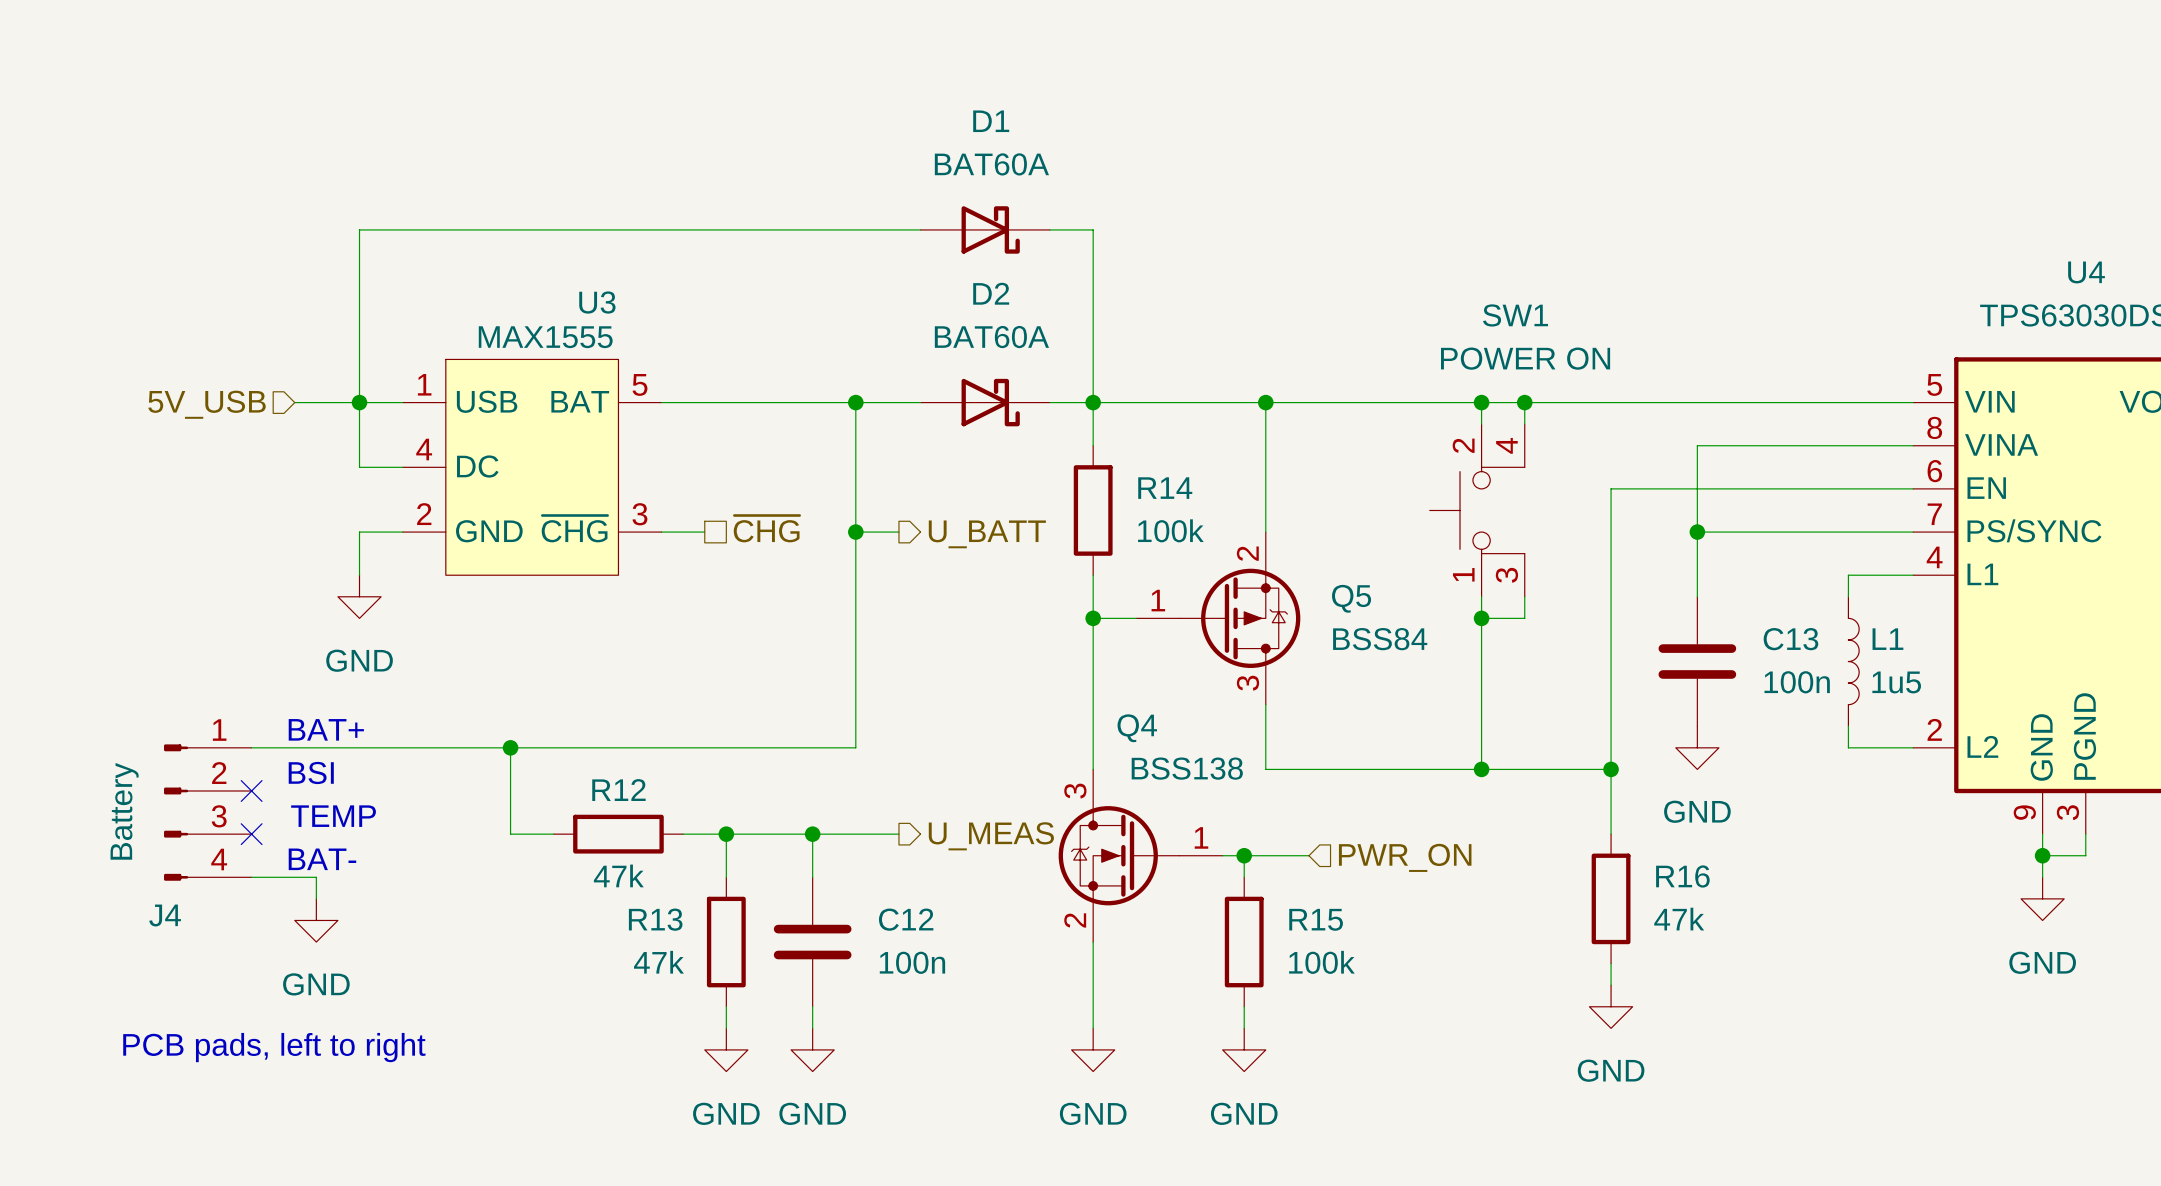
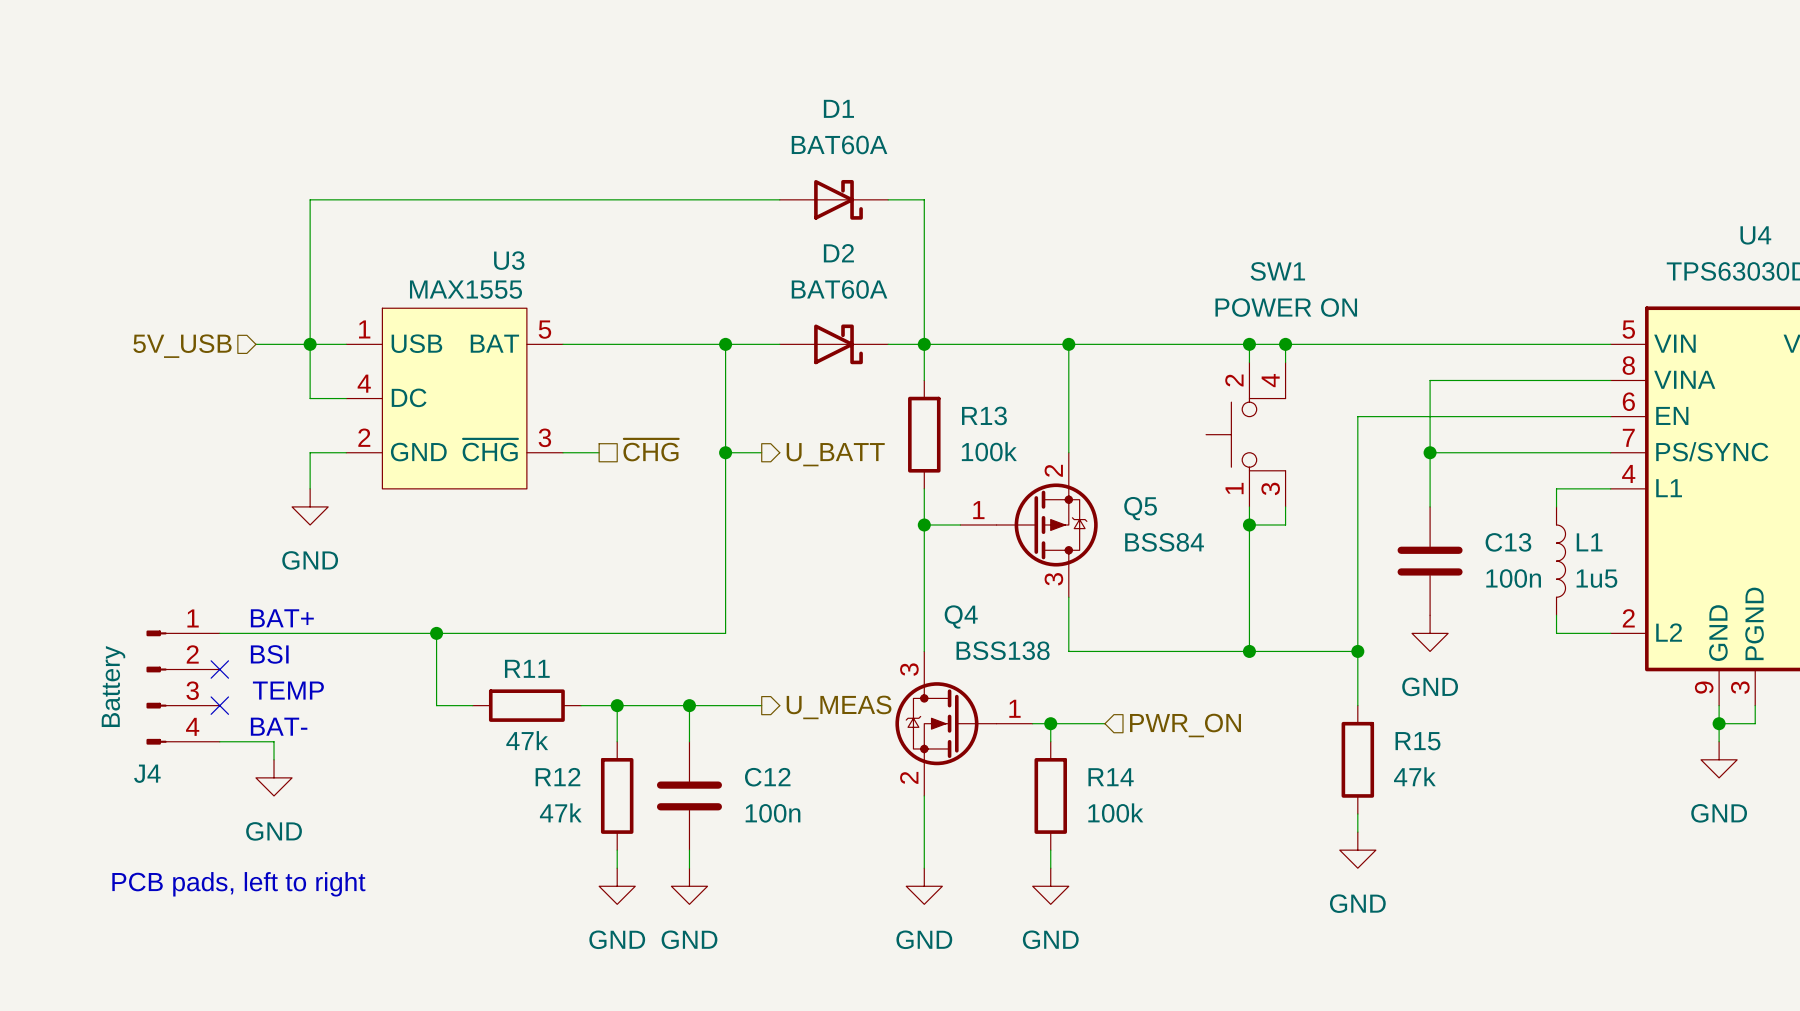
R14 name: R14 (1165, 488) -> R13 (984, 415)
R12 name: R12 (618, 790) -> R11 (527, 668)
R16 name: R16 (1682, 876) -> R15 (1417, 741)
R13 name: R13 (655, 919) -> R12 (557, 777)
R15 name: R15 (1316, 919) -> R14 (1111, 777)

